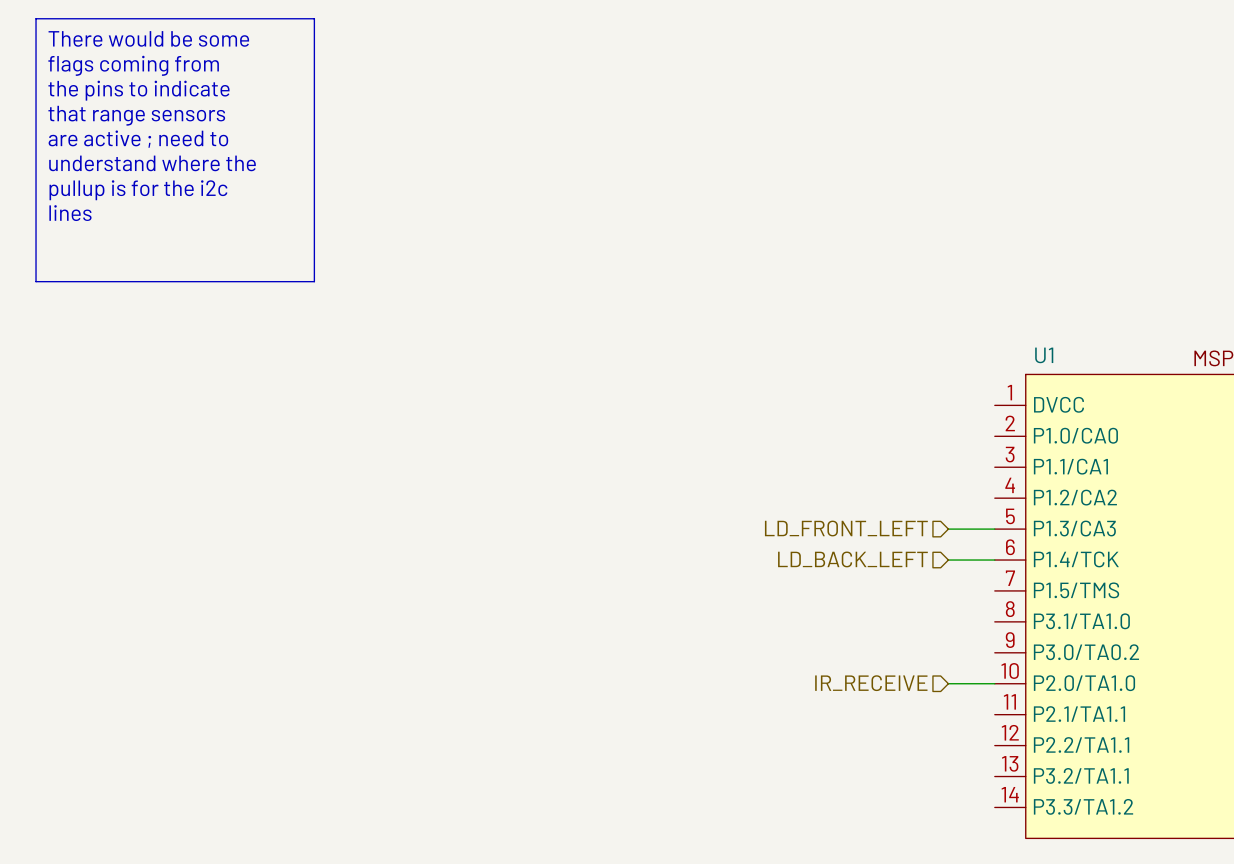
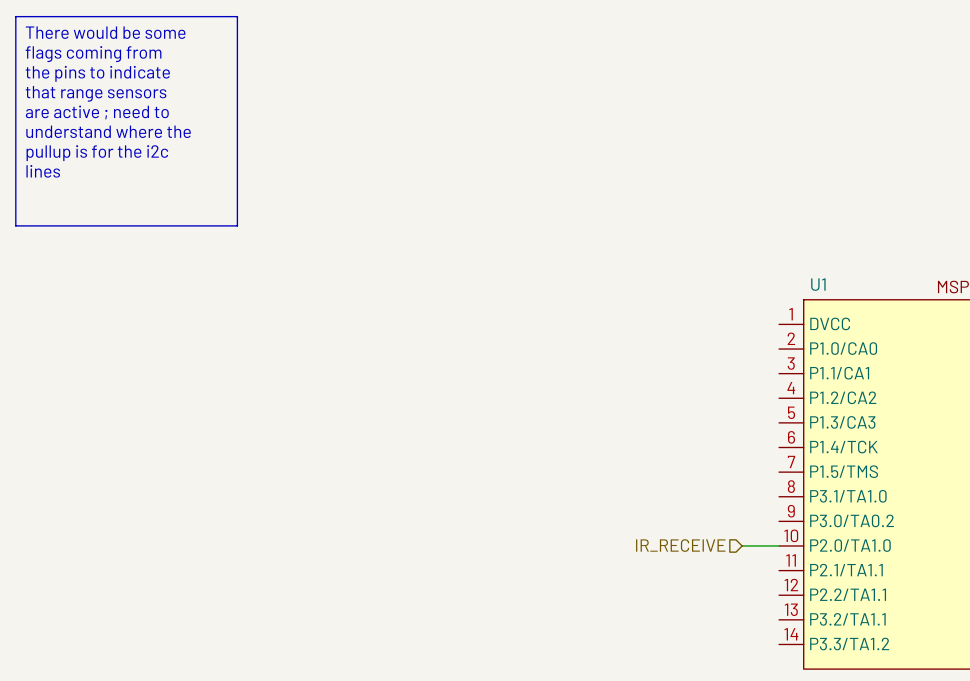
hierarchical label: LD_FRONT_LEFT (846, 528) -> none
wire: (948, 529) (994, 529) -> none
hierarchical label: LD_BACK_LEFT (852, 559) -> none
wire: (948, 560) (994, 560) -> none

